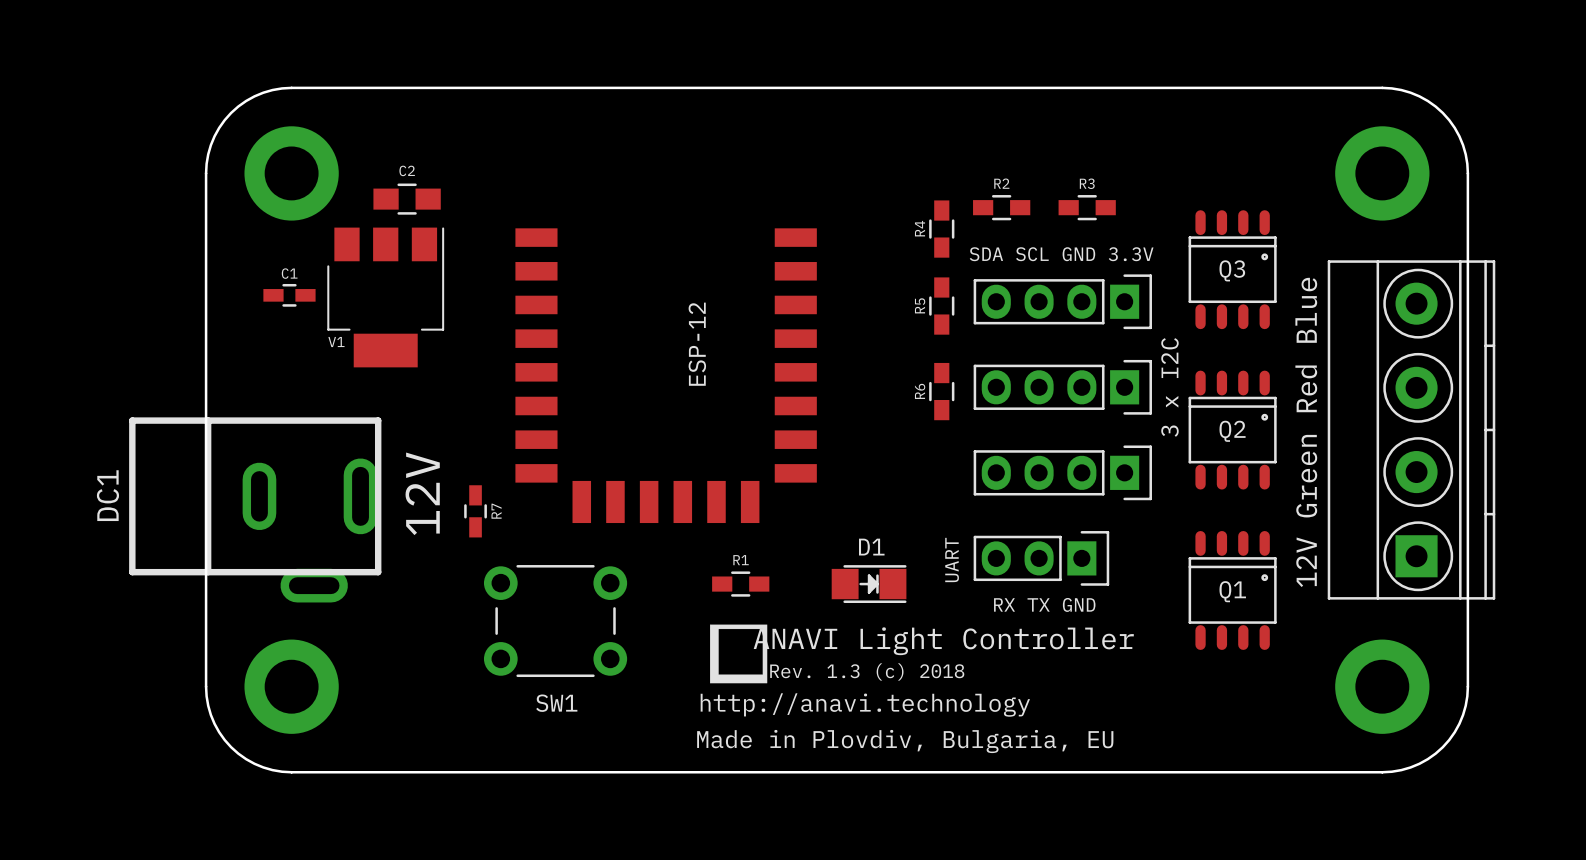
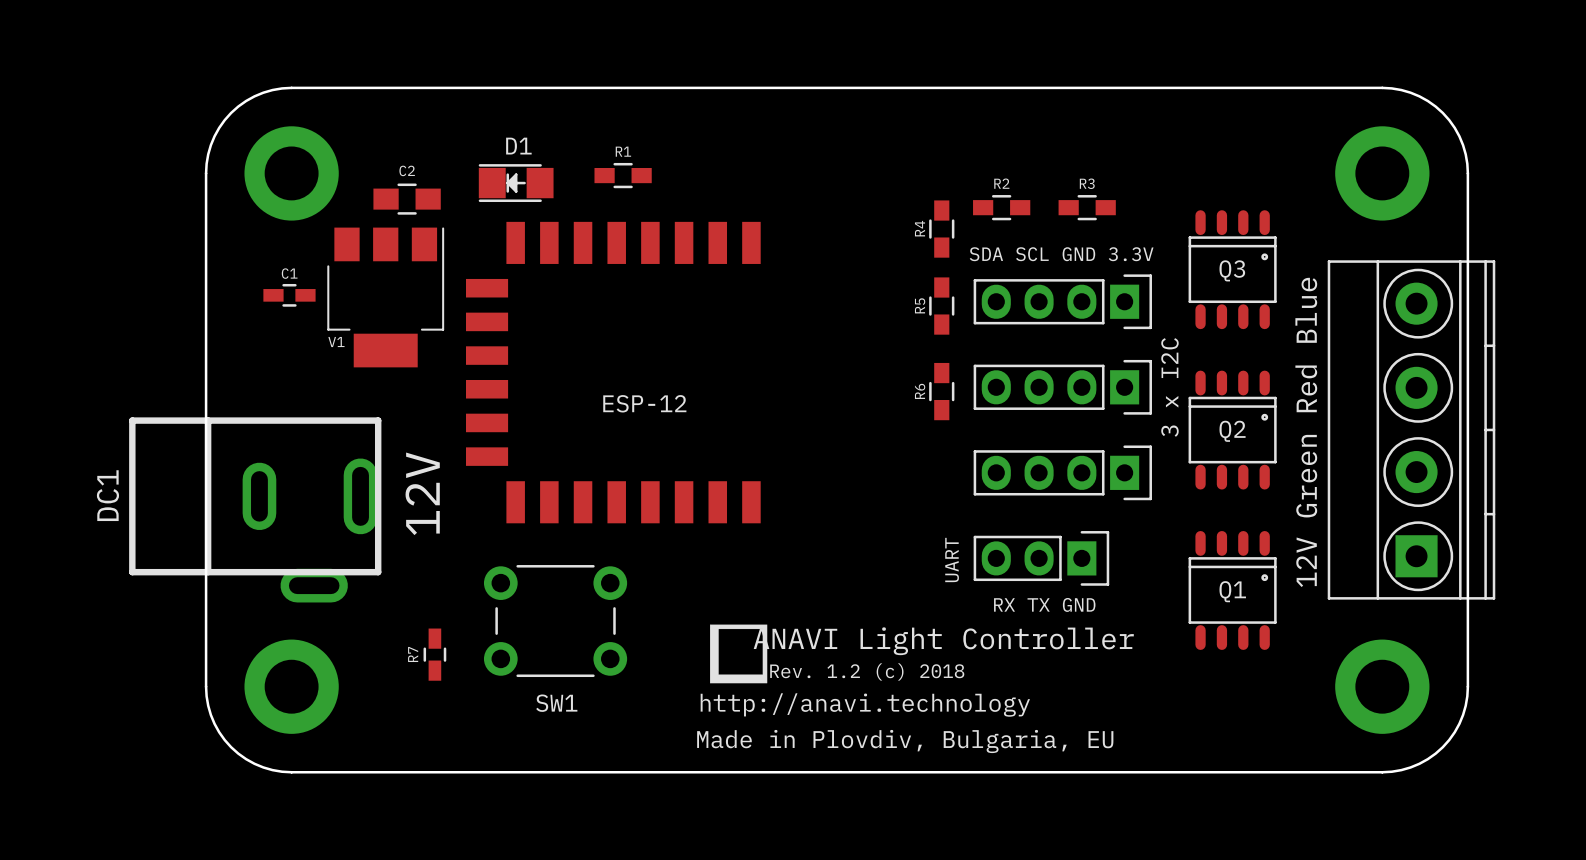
ESP-12 rotation: 0° (666, 375) -> 90° clockwise (613, 372)
R7 position: (475, 511) -> (434, 654)
R7 name position: R7 (496, 511) -> R7 (413, 654)
R1 position: (740, 584) -> (623, 175)
D1 rotation: 0° (869, 584) -> 180° (516, 183)
D1 position: (869, 584) -> (516, 183)
text: Rev. 1.3 (c) 2018 (867, 671) -> Rev. 1.2 (c) 2018 (867, 671)

